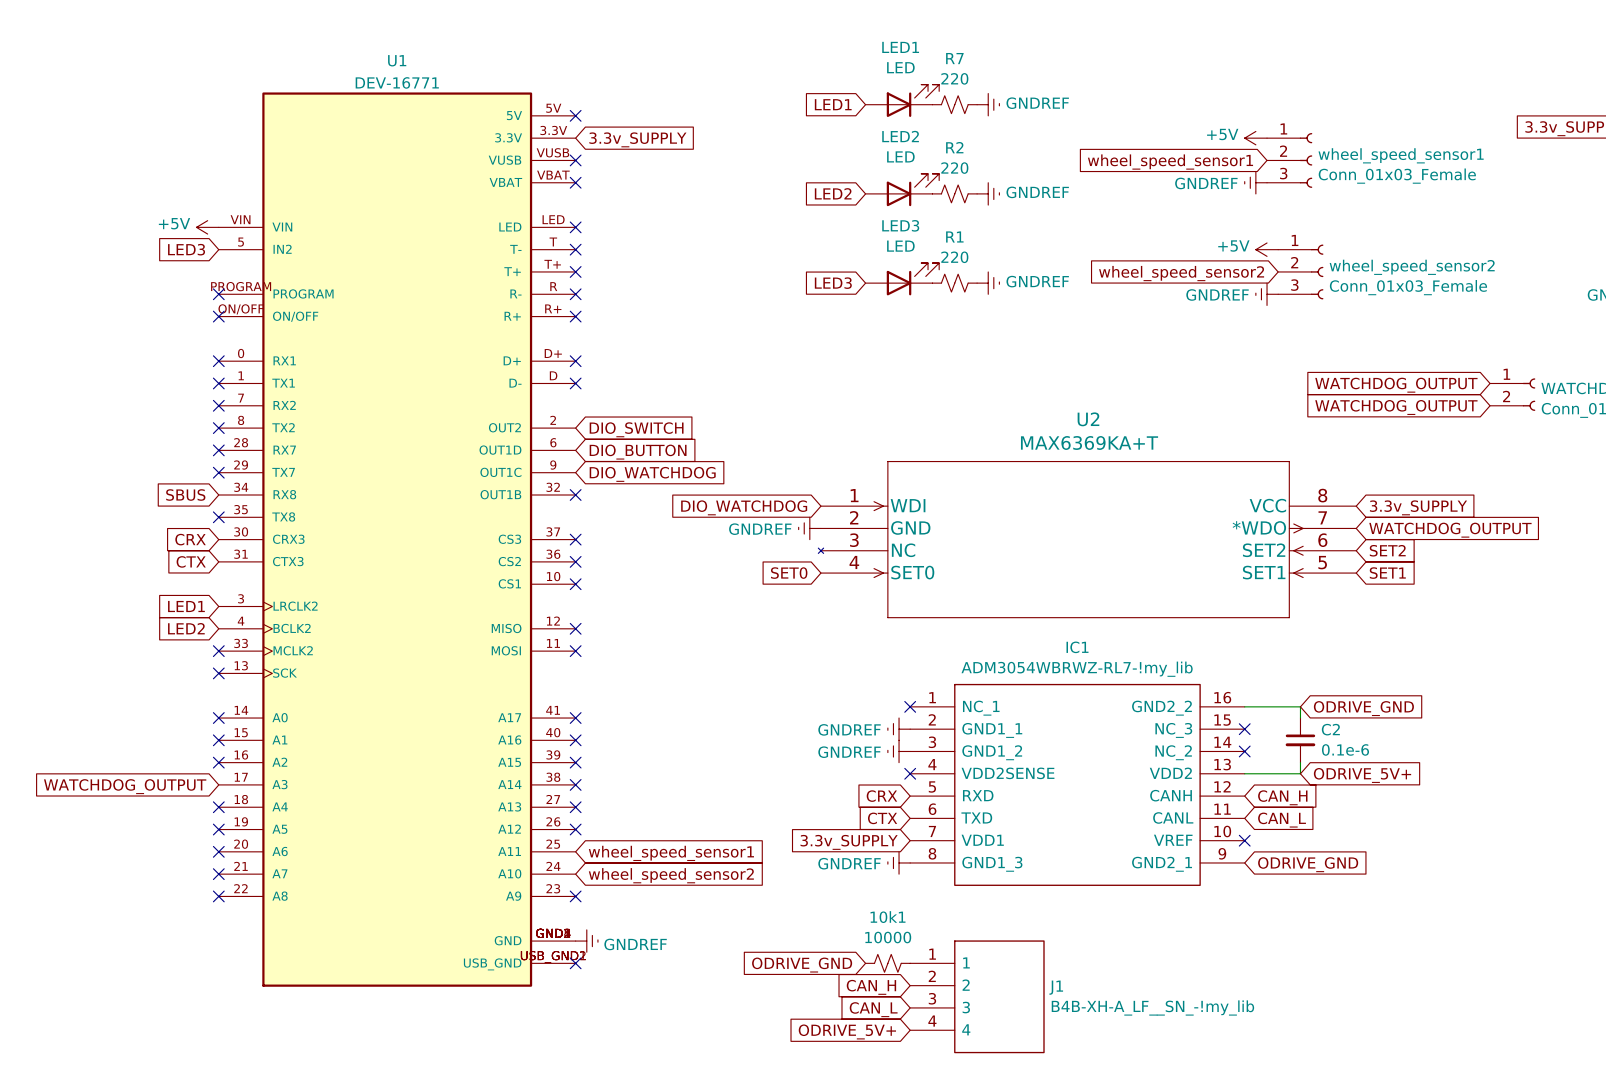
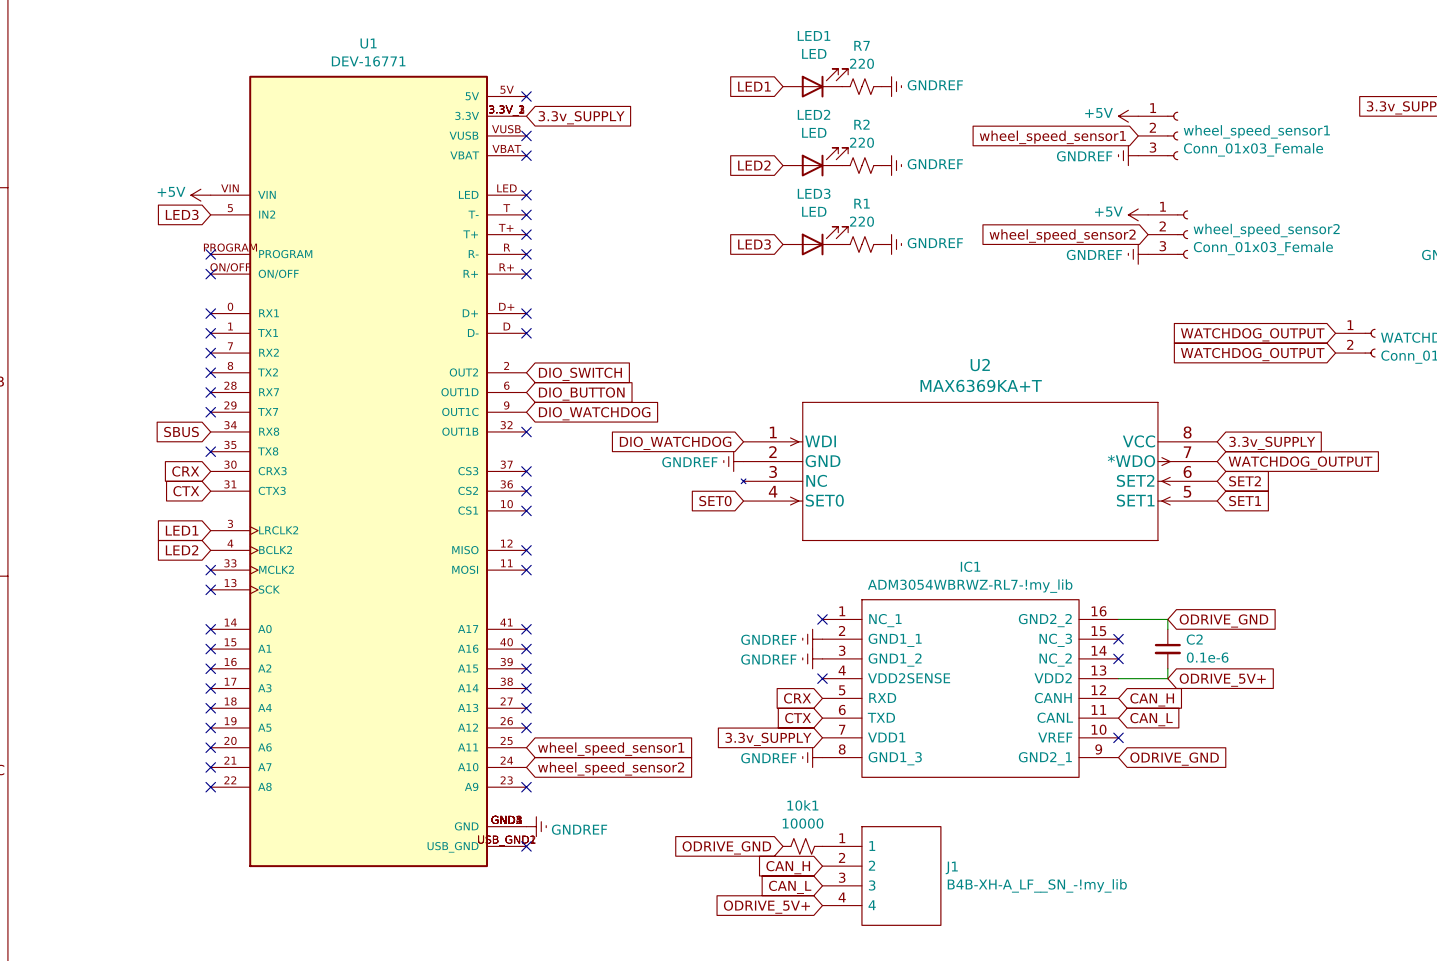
U1 symbol: [218, 92, 576, 987] -> [210, 75, 527, 868]
no-connect mark: none -> (210, 688)
global label: WATCHDOG_OUTPUT (125, 786) -> none

